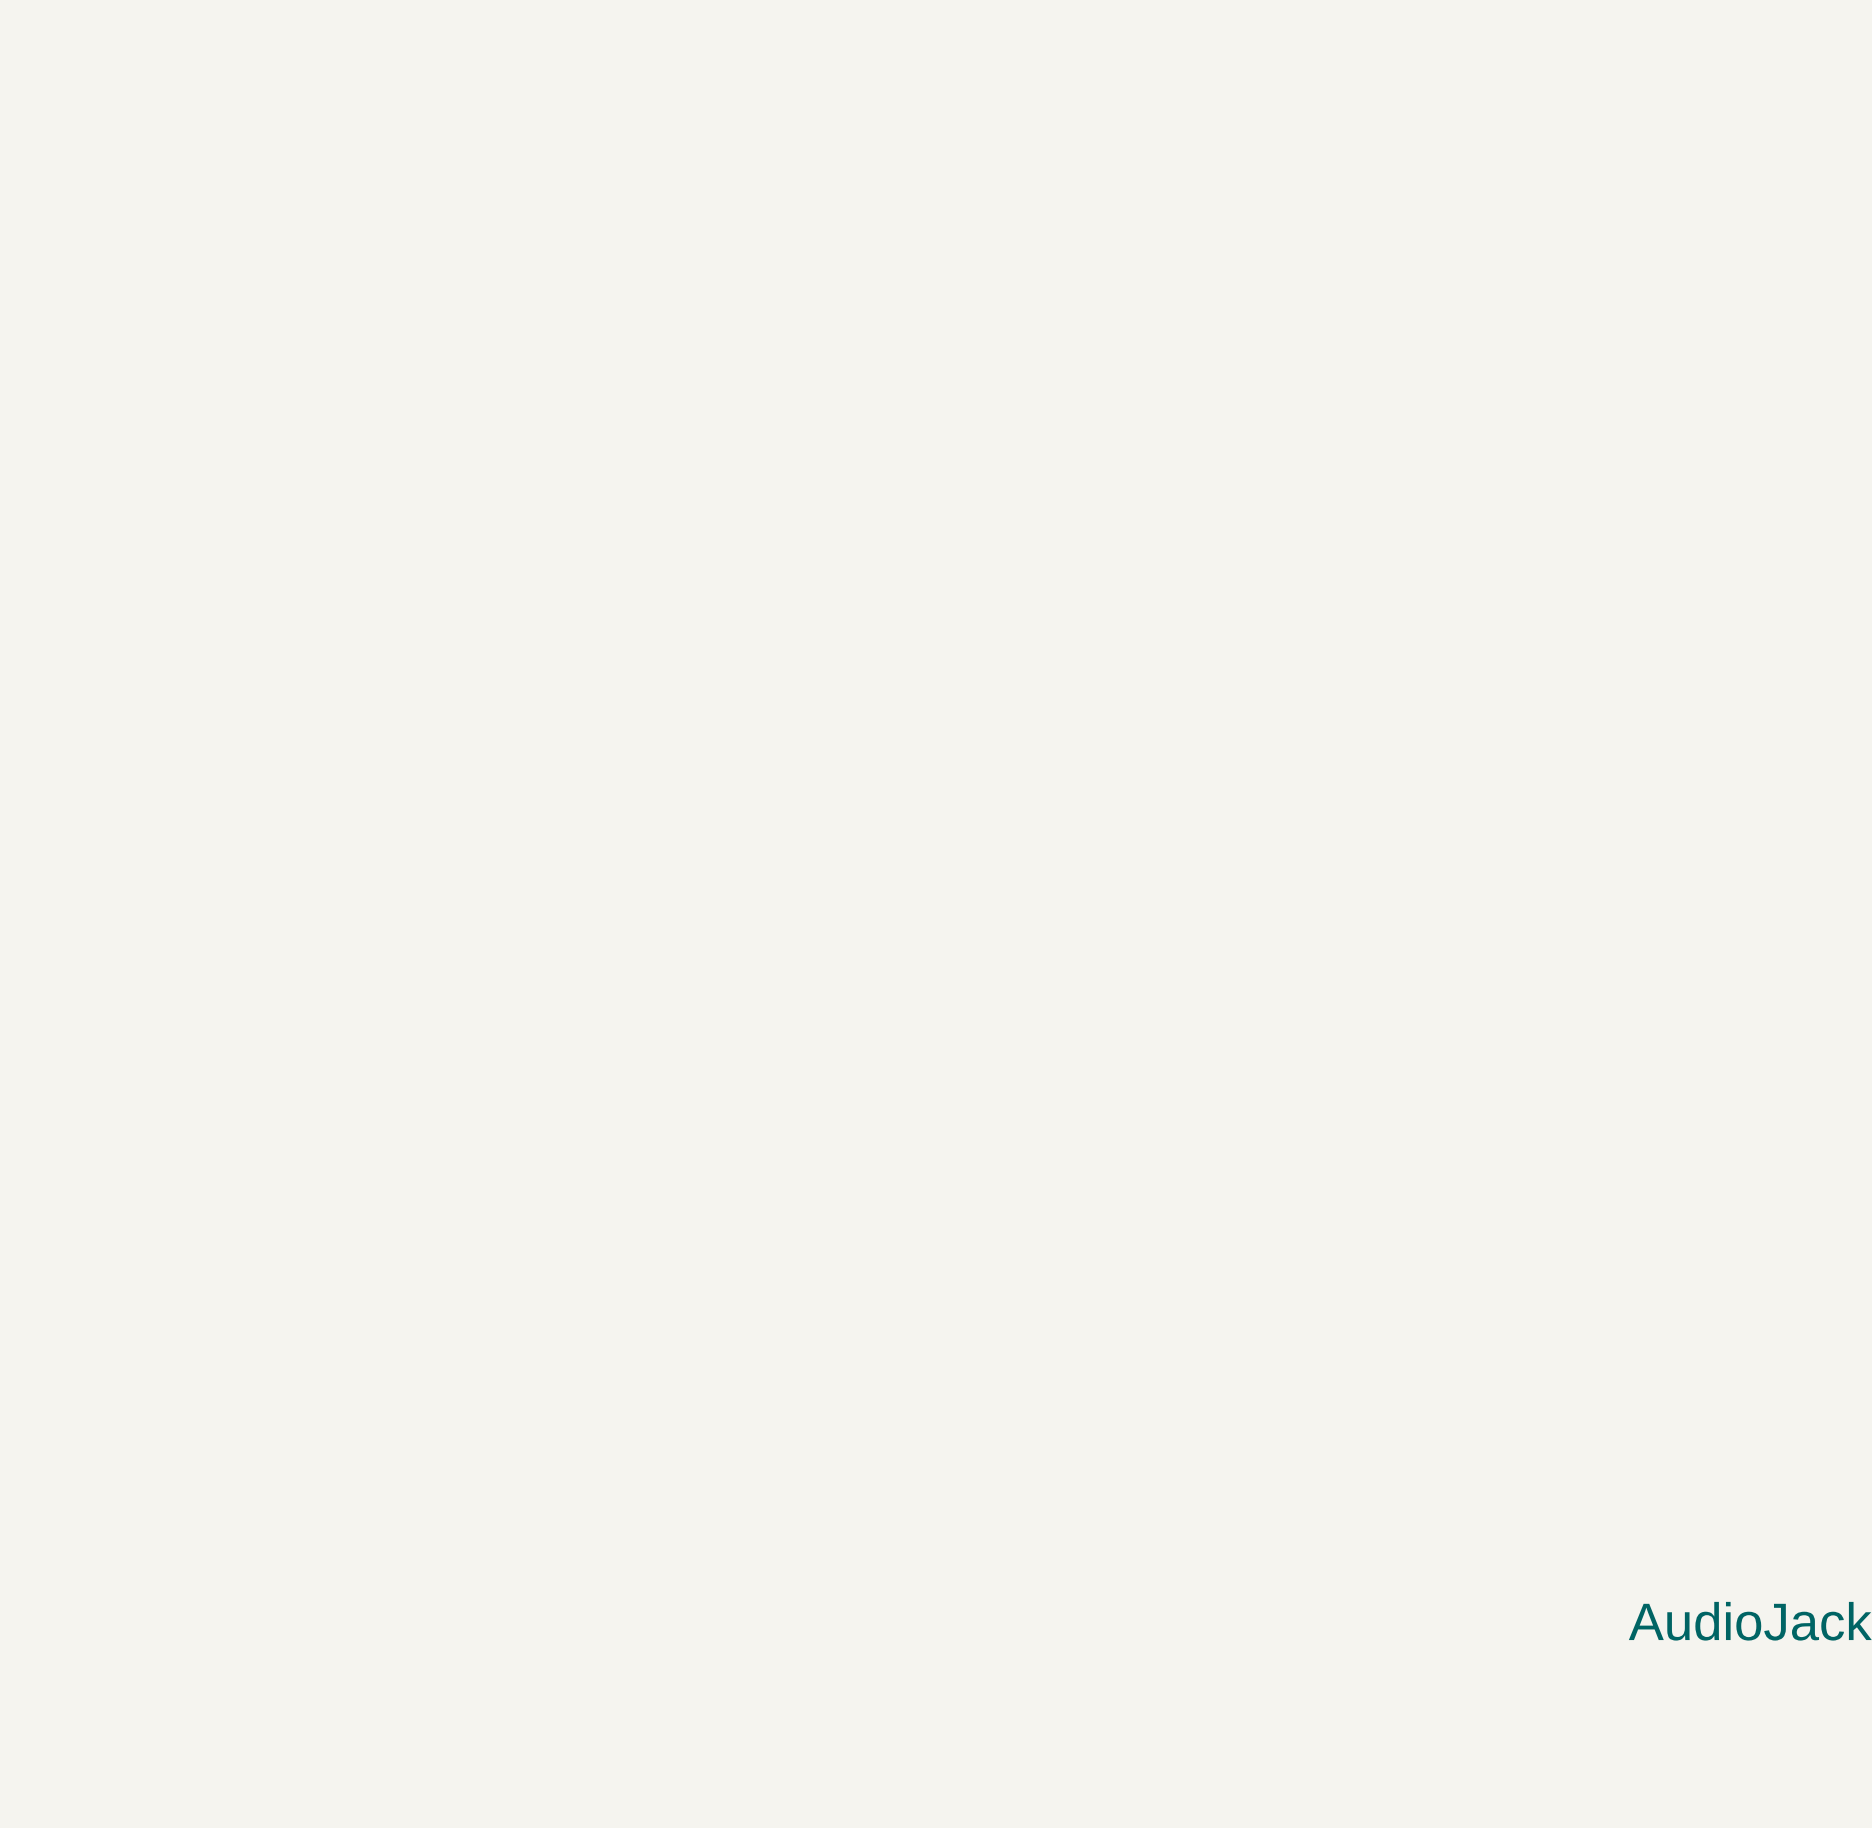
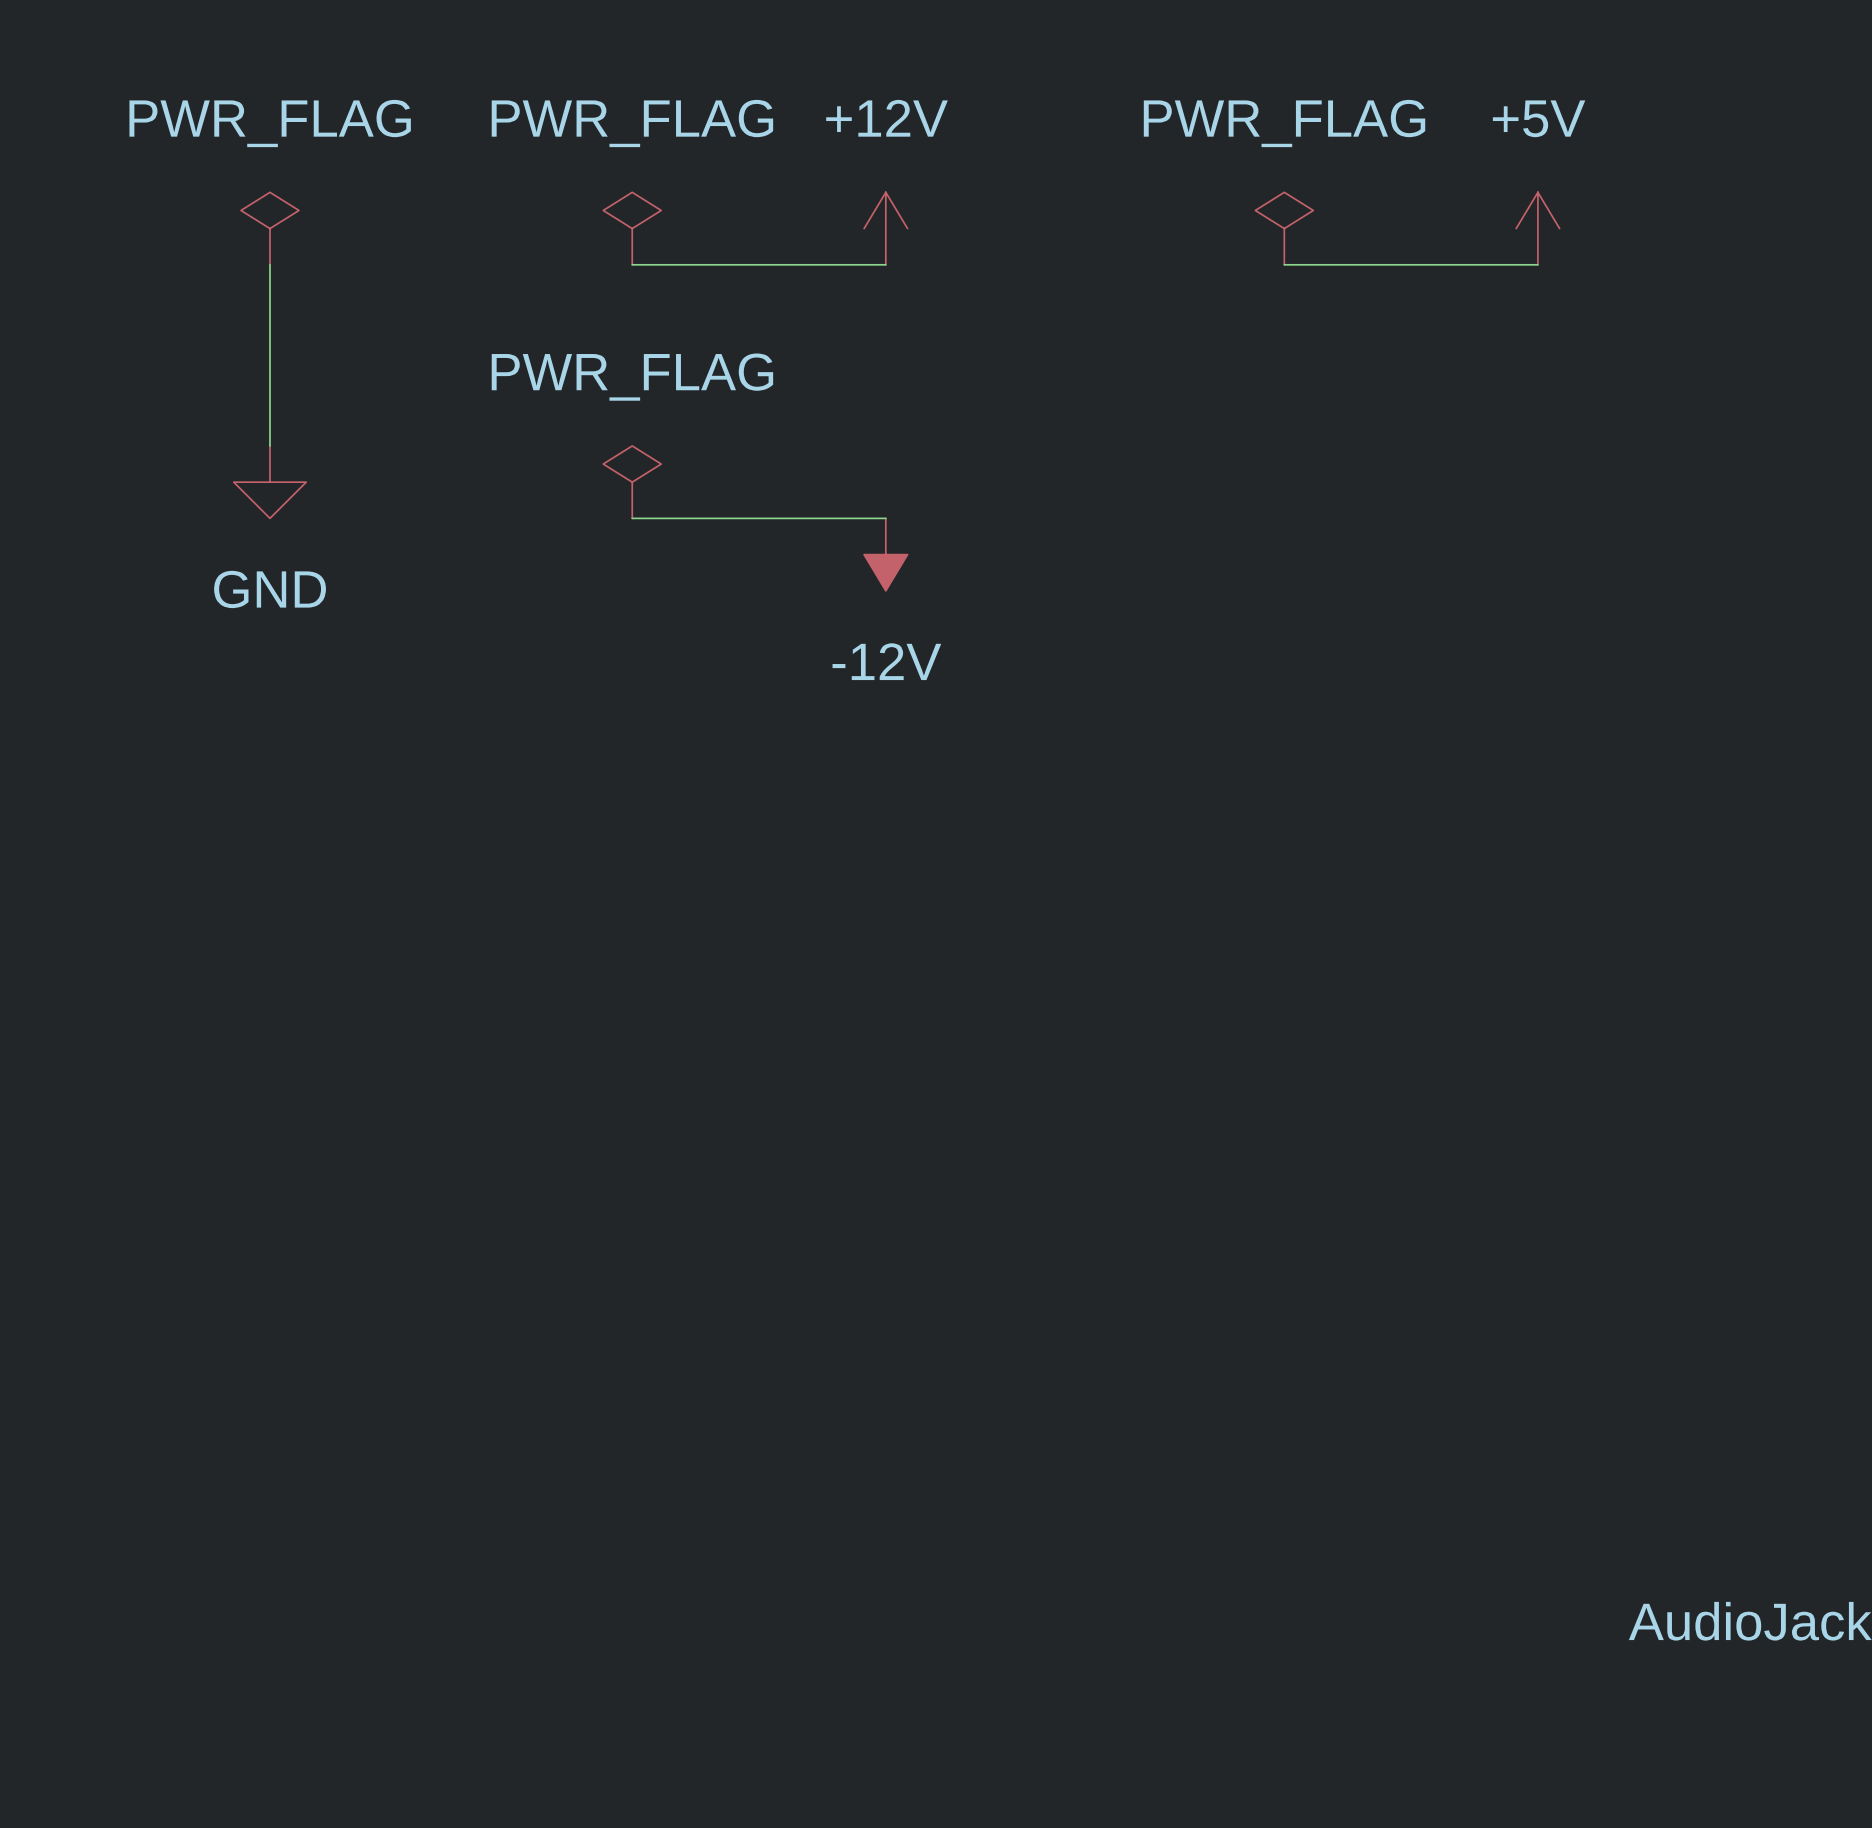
power symbol: none -> PWR_FLAG (269, 228)
power symbol: none -> PWR_FLAG (632, 228)
power symbol: none -> +12V (885, 228)
power symbol: none -> PWR_FLAG (1284, 228)
power symbol: none -> +5V (1537, 228)
wire: none -> (269, 264) (269, 445)
wire: none -> (632, 264) (885, 264)
wire: none -> (1284, 264) (1537, 264)
power symbol: none -> GND (269, 482)
power symbol: none -> PWR_FLAG (632, 482)
wire: none -> (632, 518) (885, 518)
power symbol: none -> -12V (885, 554)

